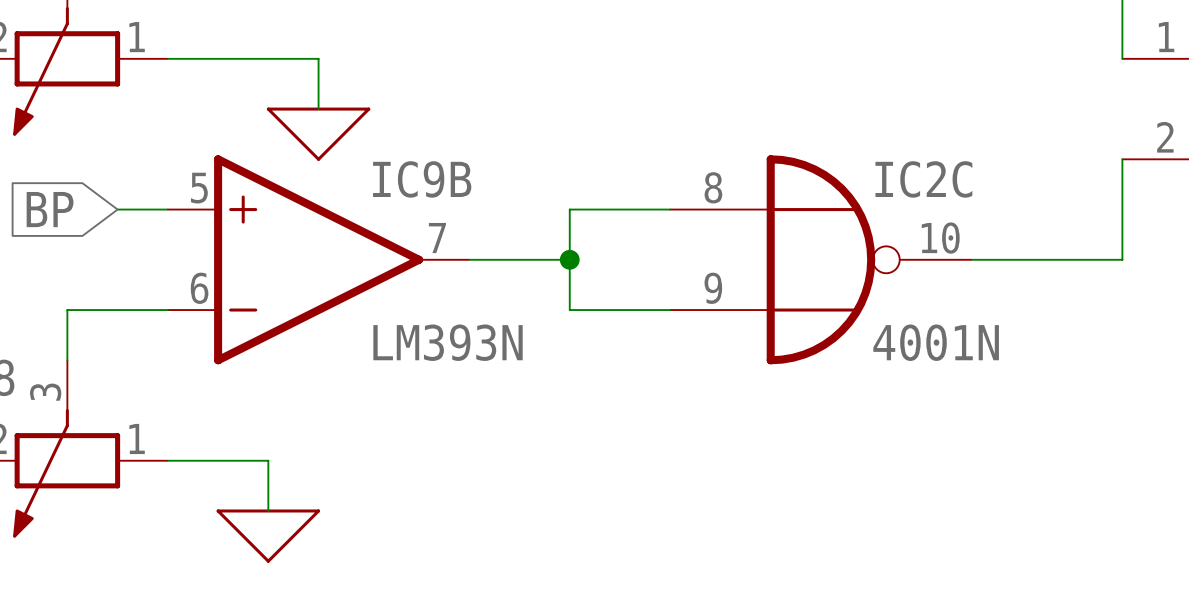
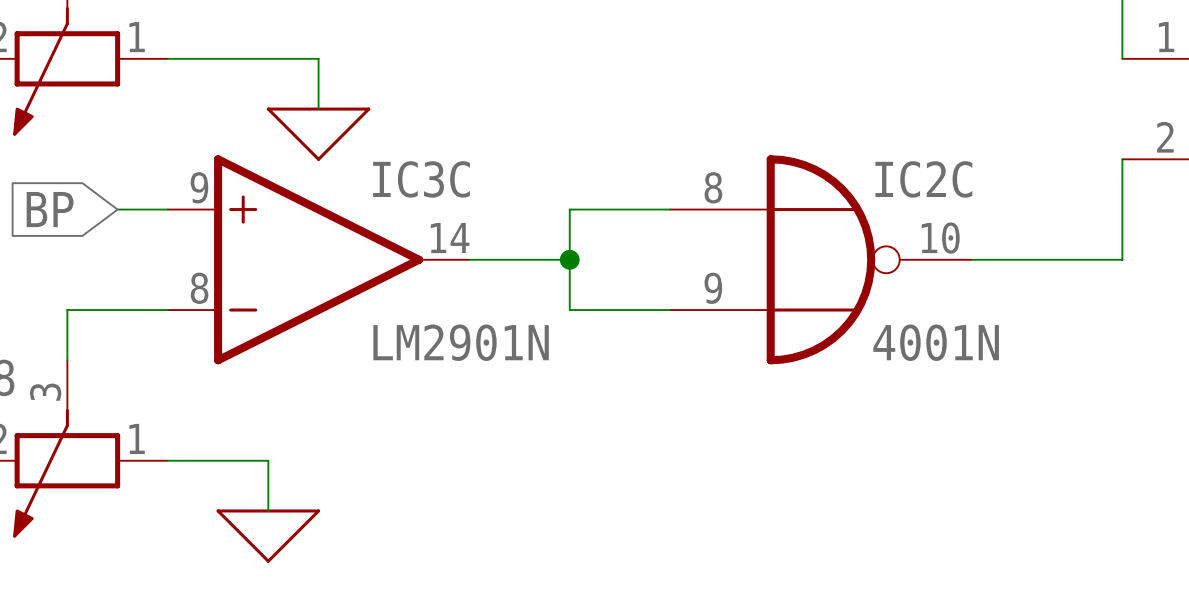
IC9B name: IC9B (422, 179) -> IC3C (421, 179)
IC9B pin number: 5 (199, 188) -> 9 (199, 187)
IC9B pin number: 7 (437, 238) -> 14 (450, 238)
IC9B pin number: 6 (199, 288) -> 8 (199, 288)
IC9B value: LM393N (448, 342) -> LM2901N (461, 342)

